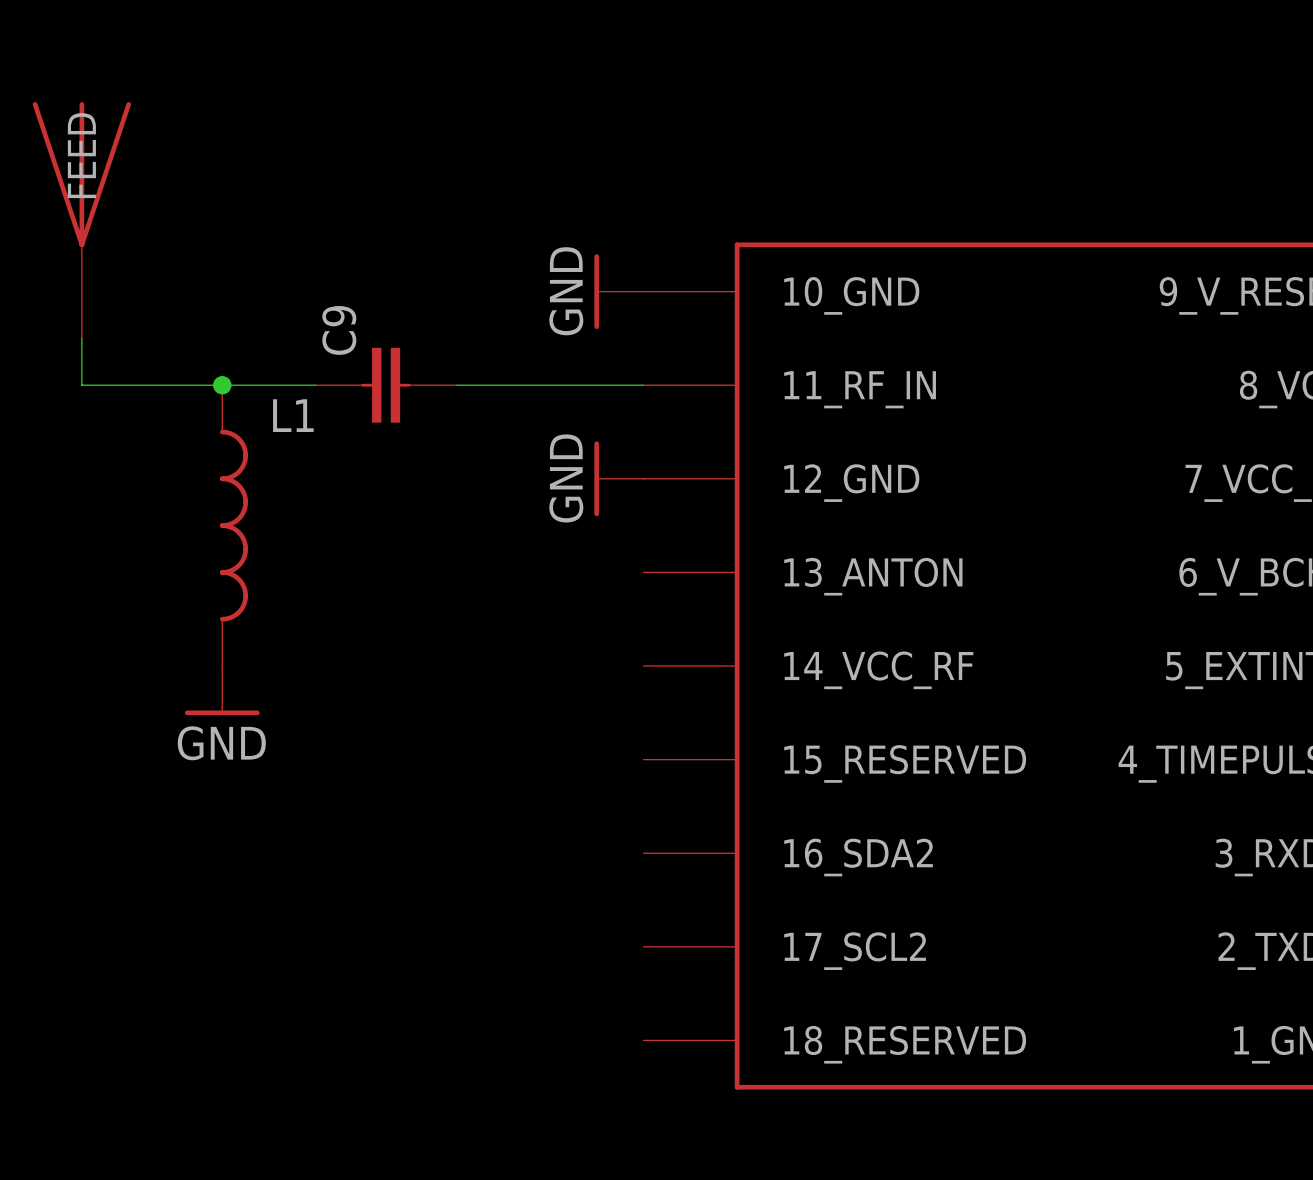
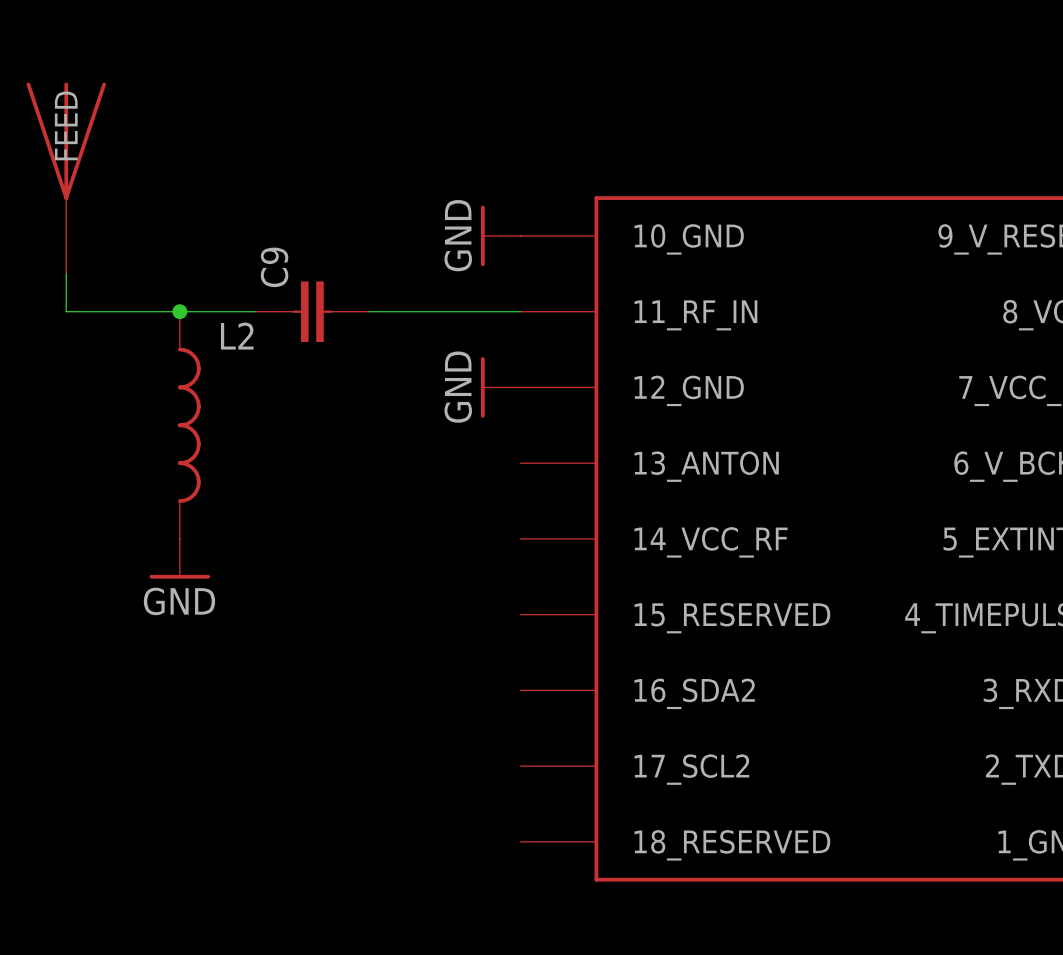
L1 name: L1 (293, 415) -> L2 (237, 336)

